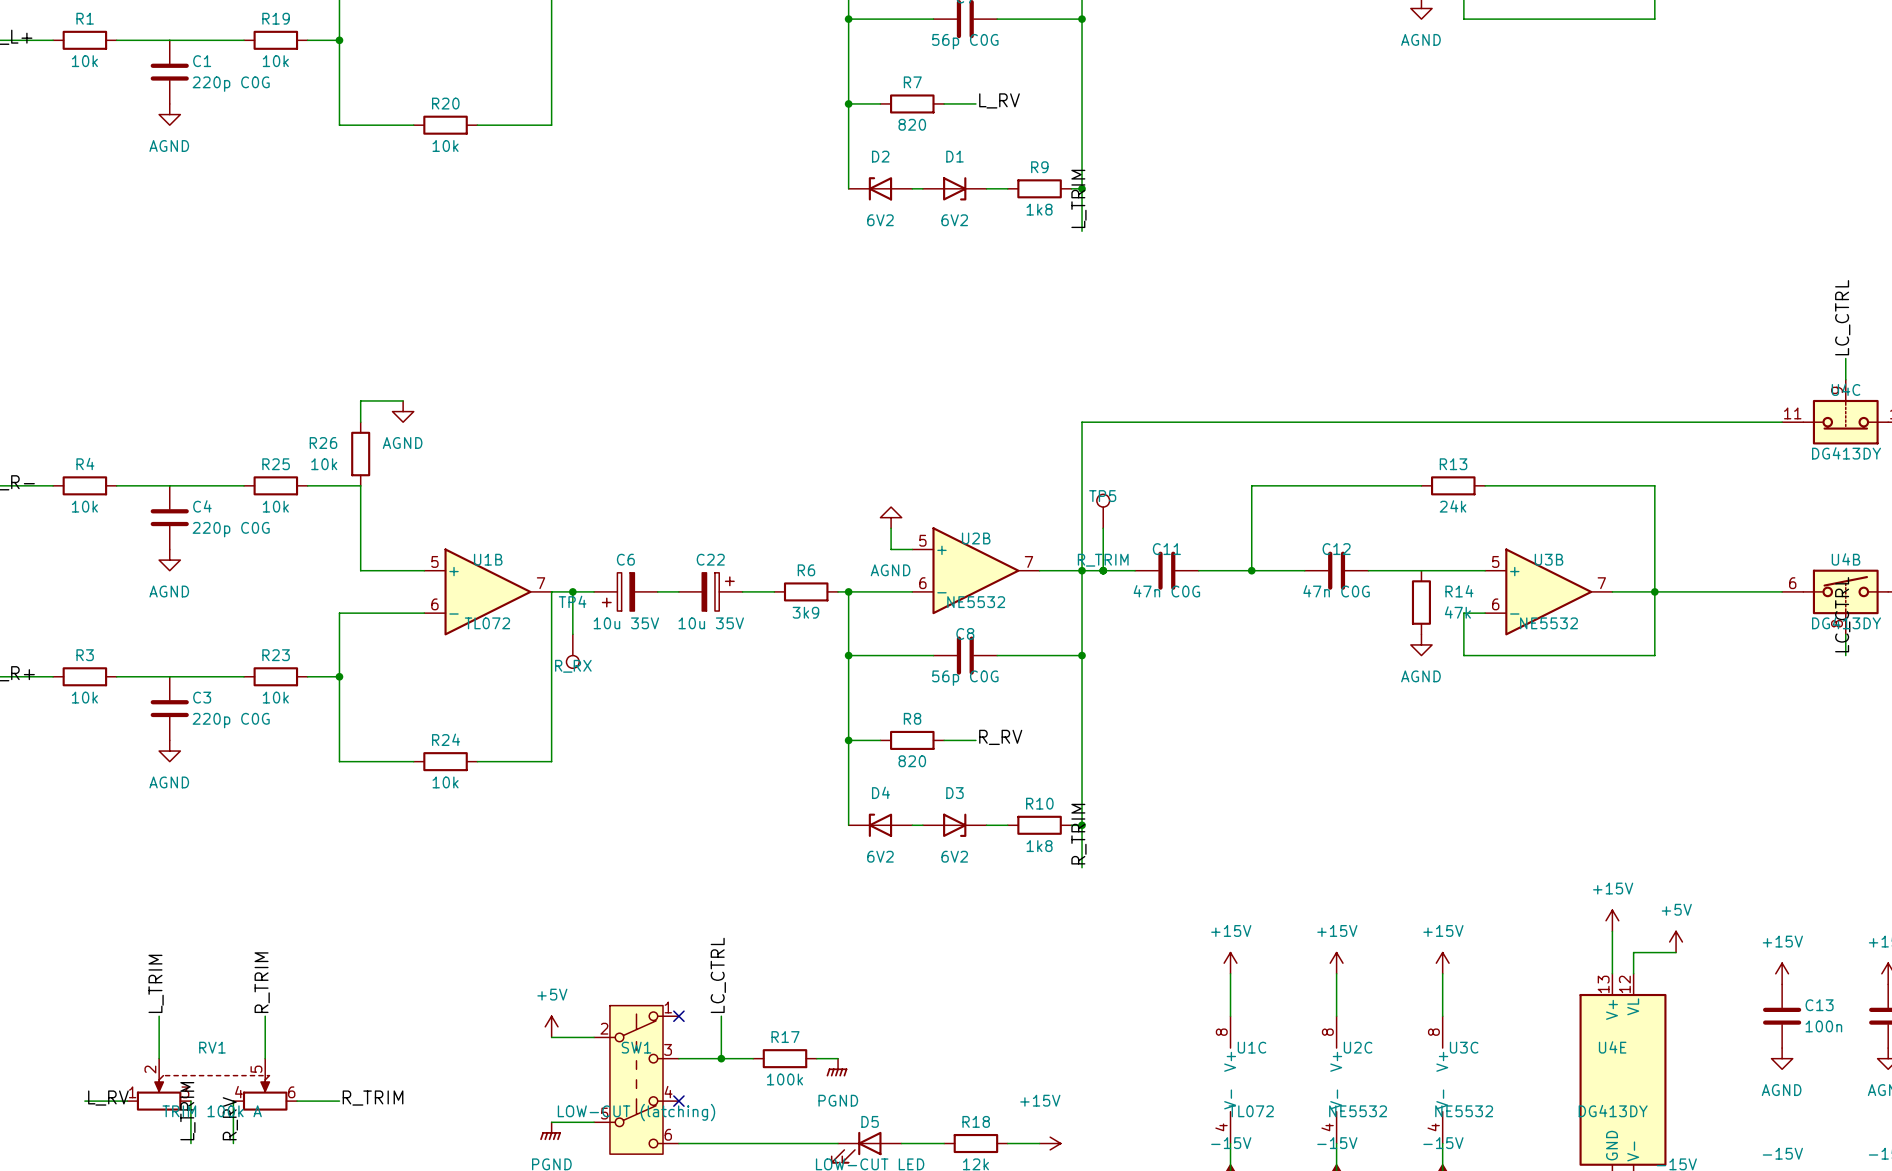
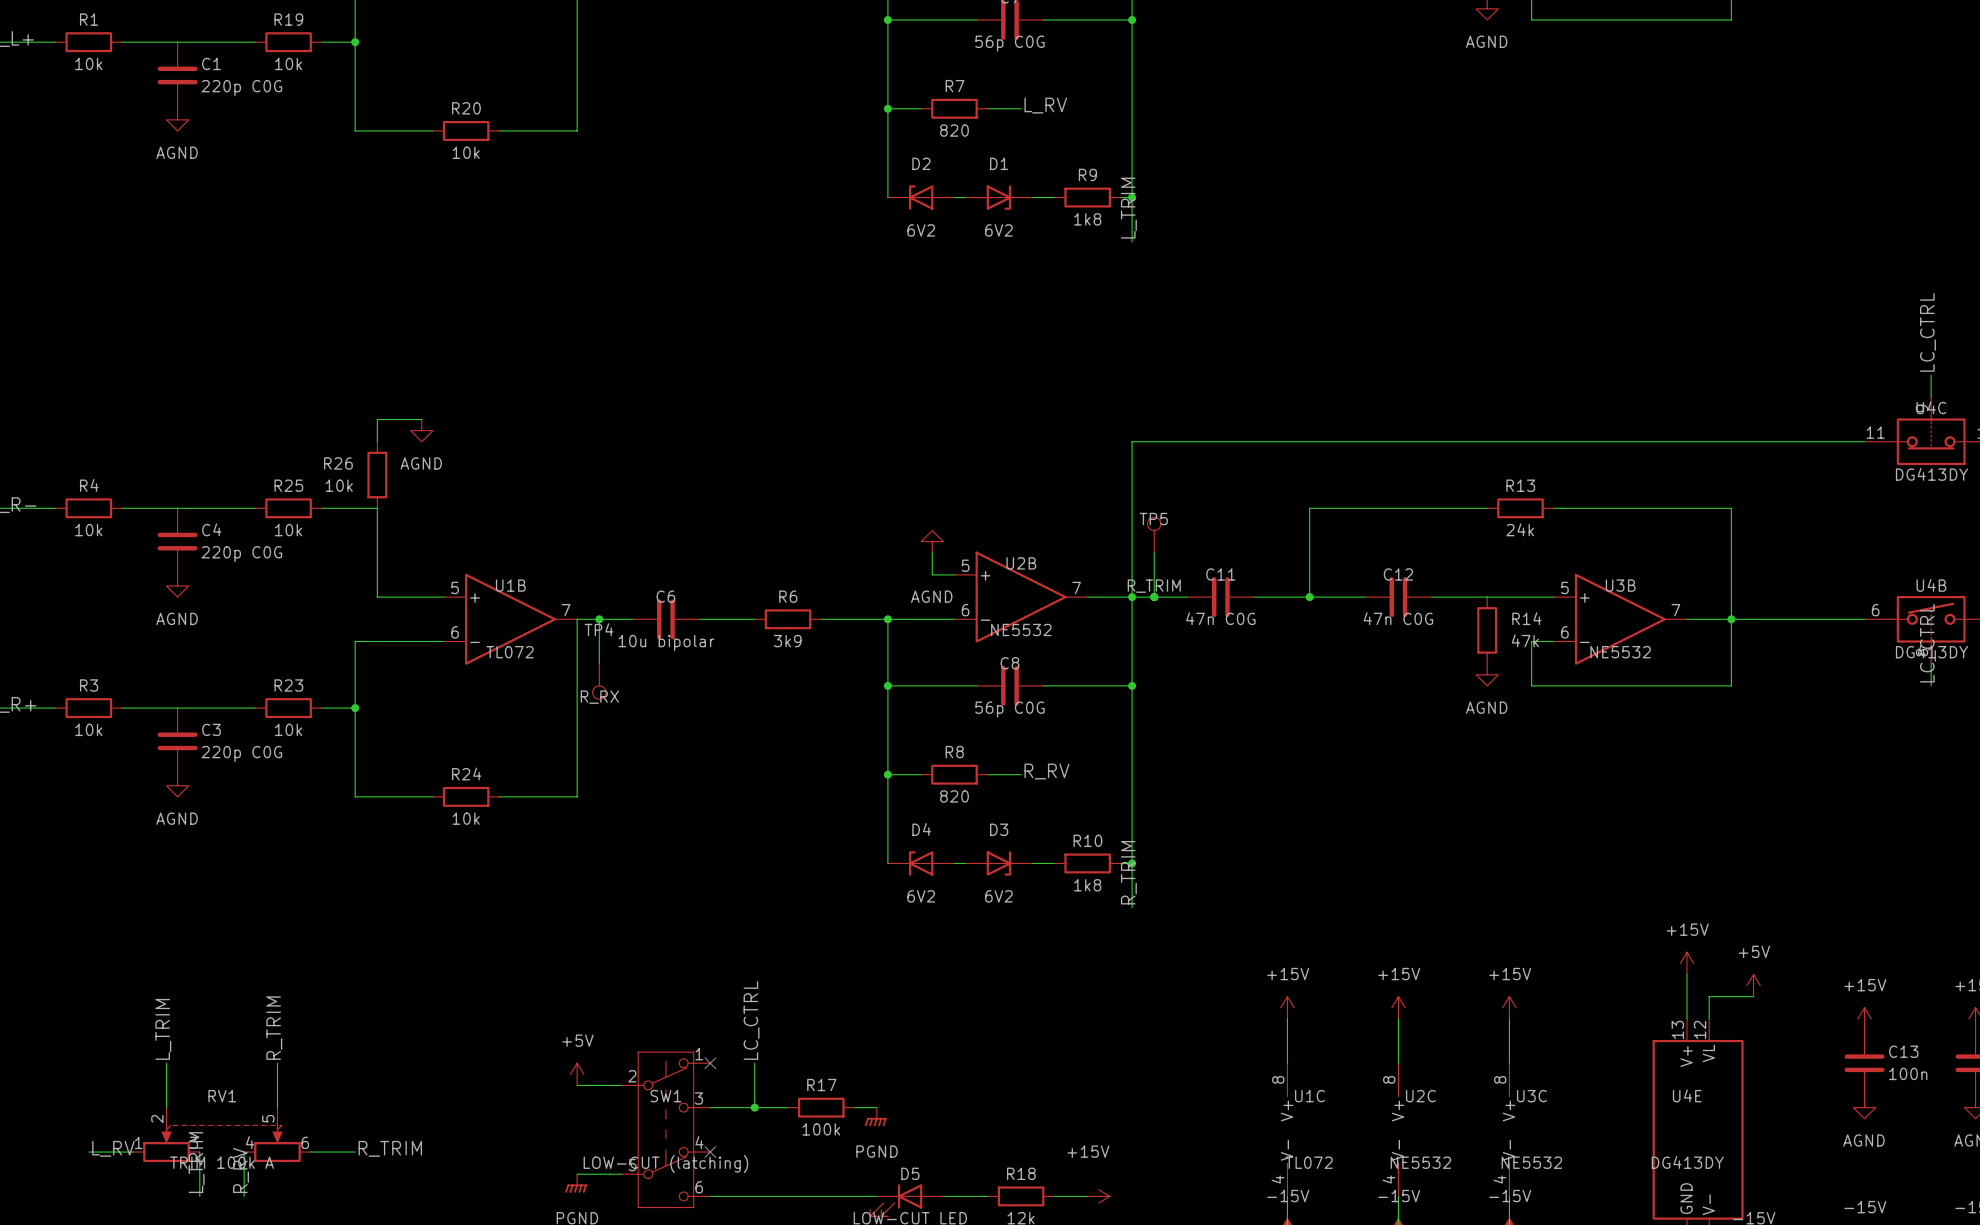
C6 symbol: [594, 572, 658, 612] -> [632, 599, 700, 640]
C22: 10u 35V (710, 591) -> none
wire: (742, 591) (774, 591) -> none
wire: none -> (821, 619) (876, 619)
R6 position: (806, 591) -> (788, 619)
C6 value: 10u 35V (626, 623) -> 10u bipolar (666, 642)

